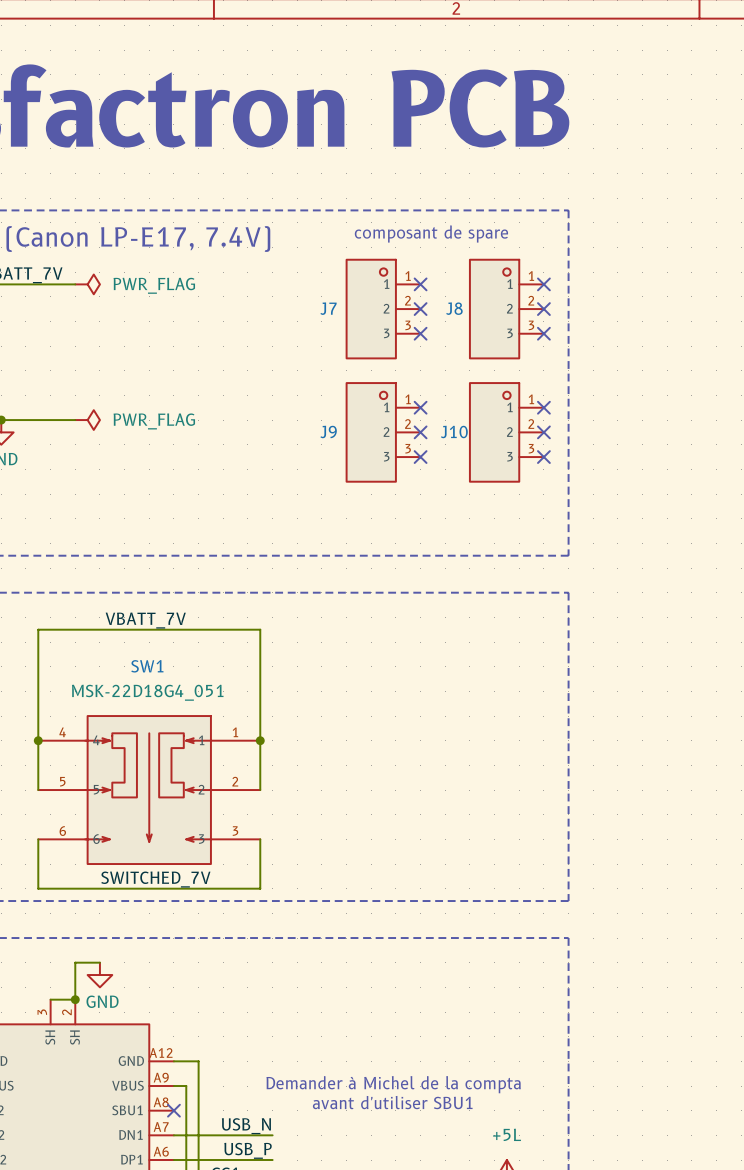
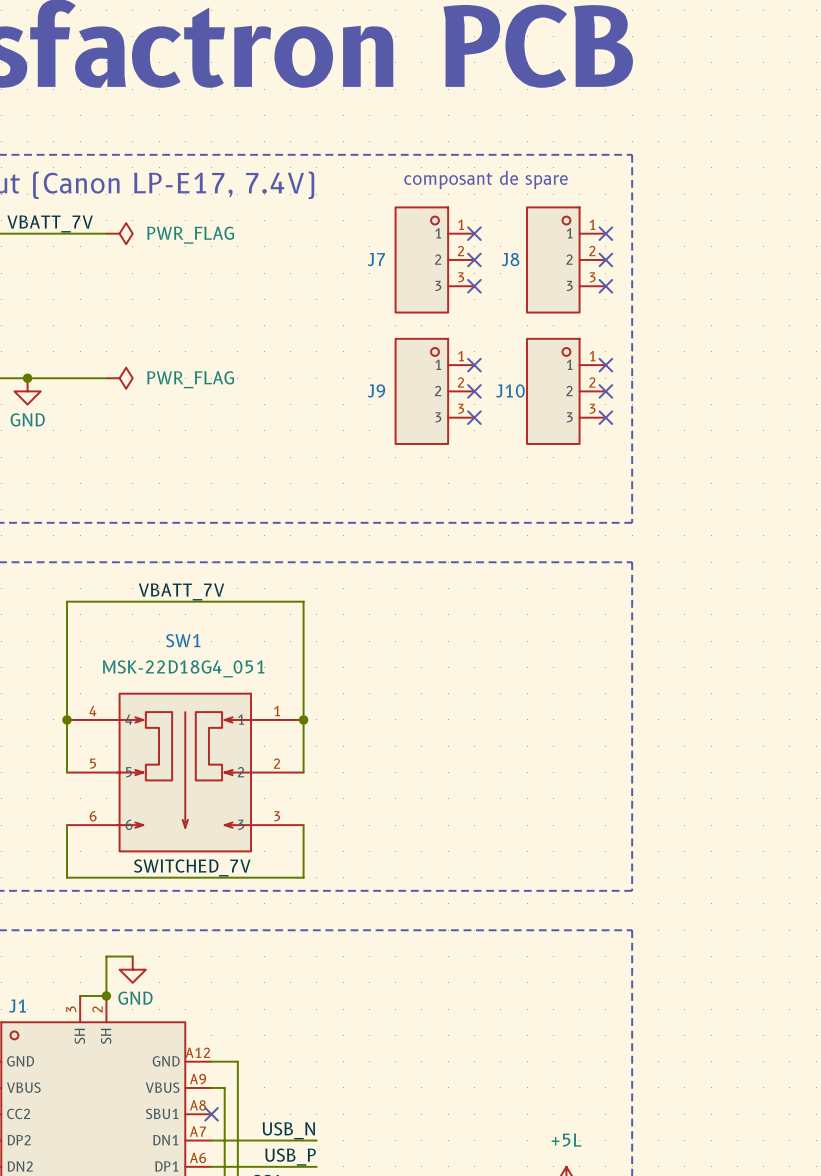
text: Demander à Michel de la compta (393, 1084) -> none
text: avant d'utiliser SBU1 (392, 1102) -> none

